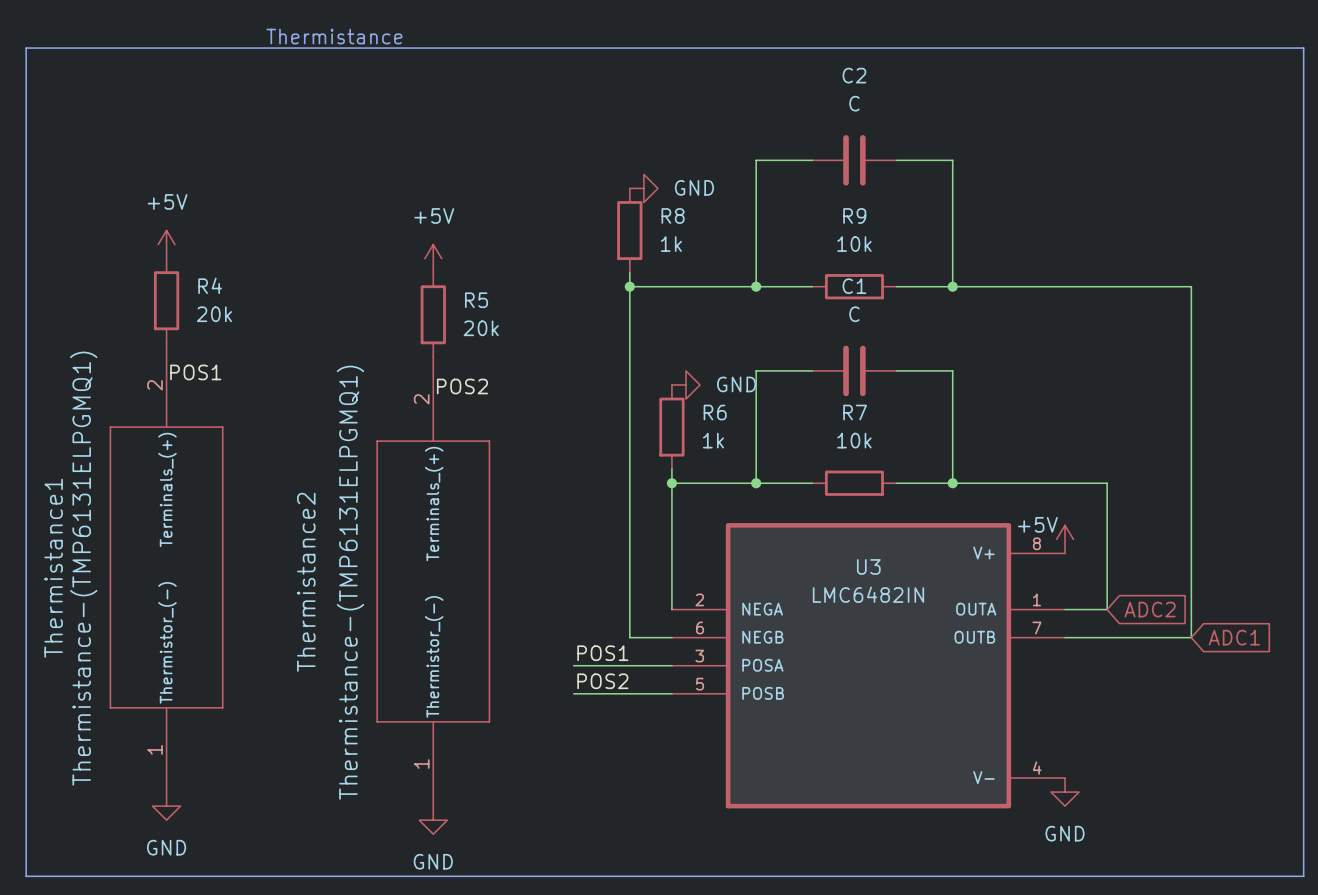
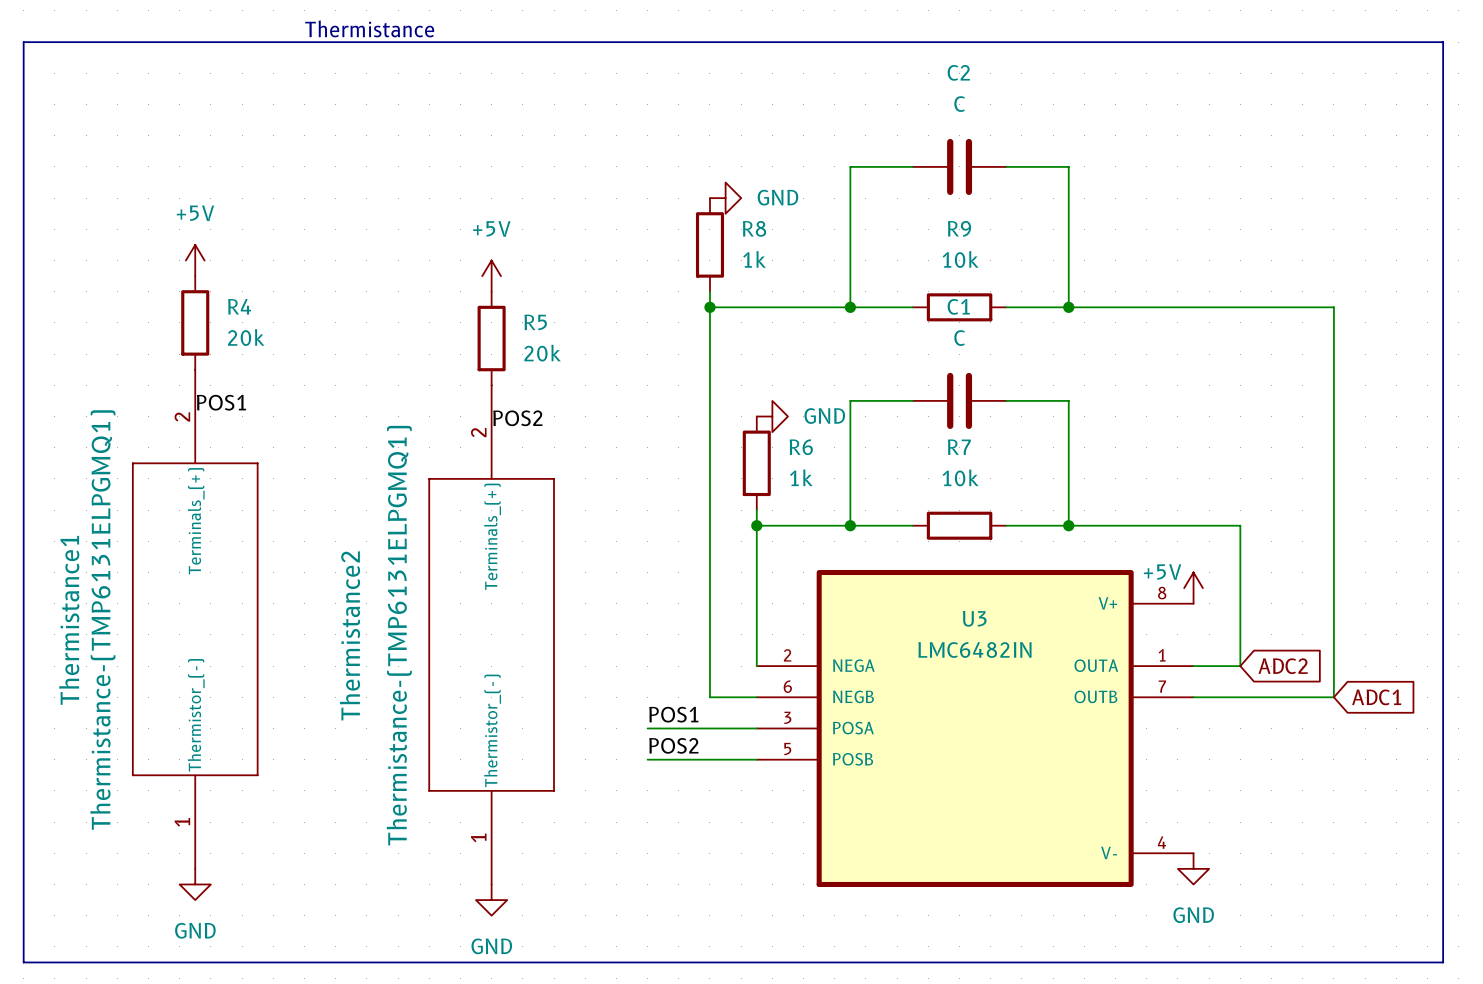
line: (26, 48) (26, 876) -> (39, 42) (23, 42) (23, 962) (39, 962)
line: (1289, 48) (1303, 48) (1303, 876) (1289, 876) -> (1443, 42) (1443, 962)

